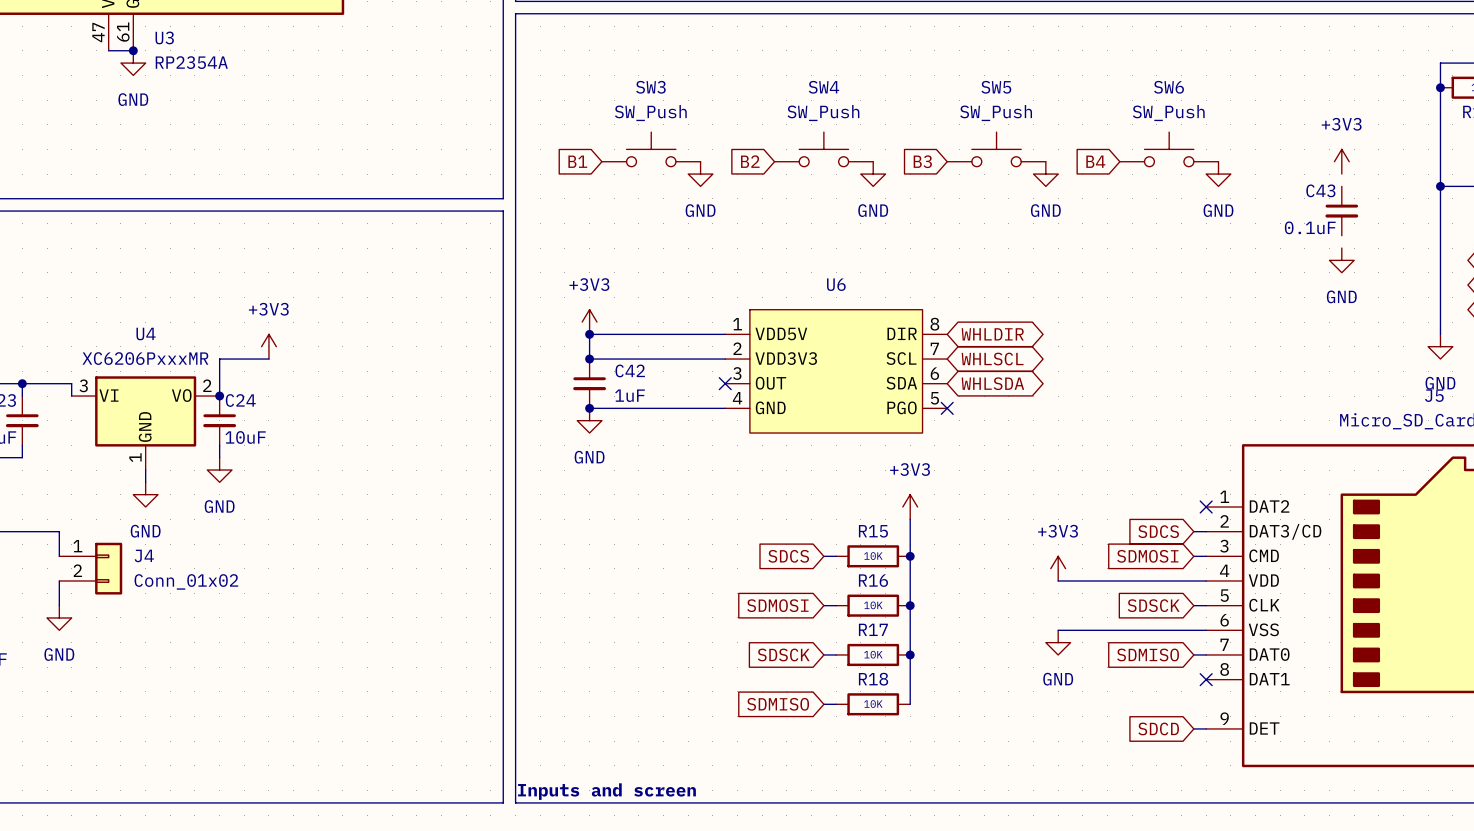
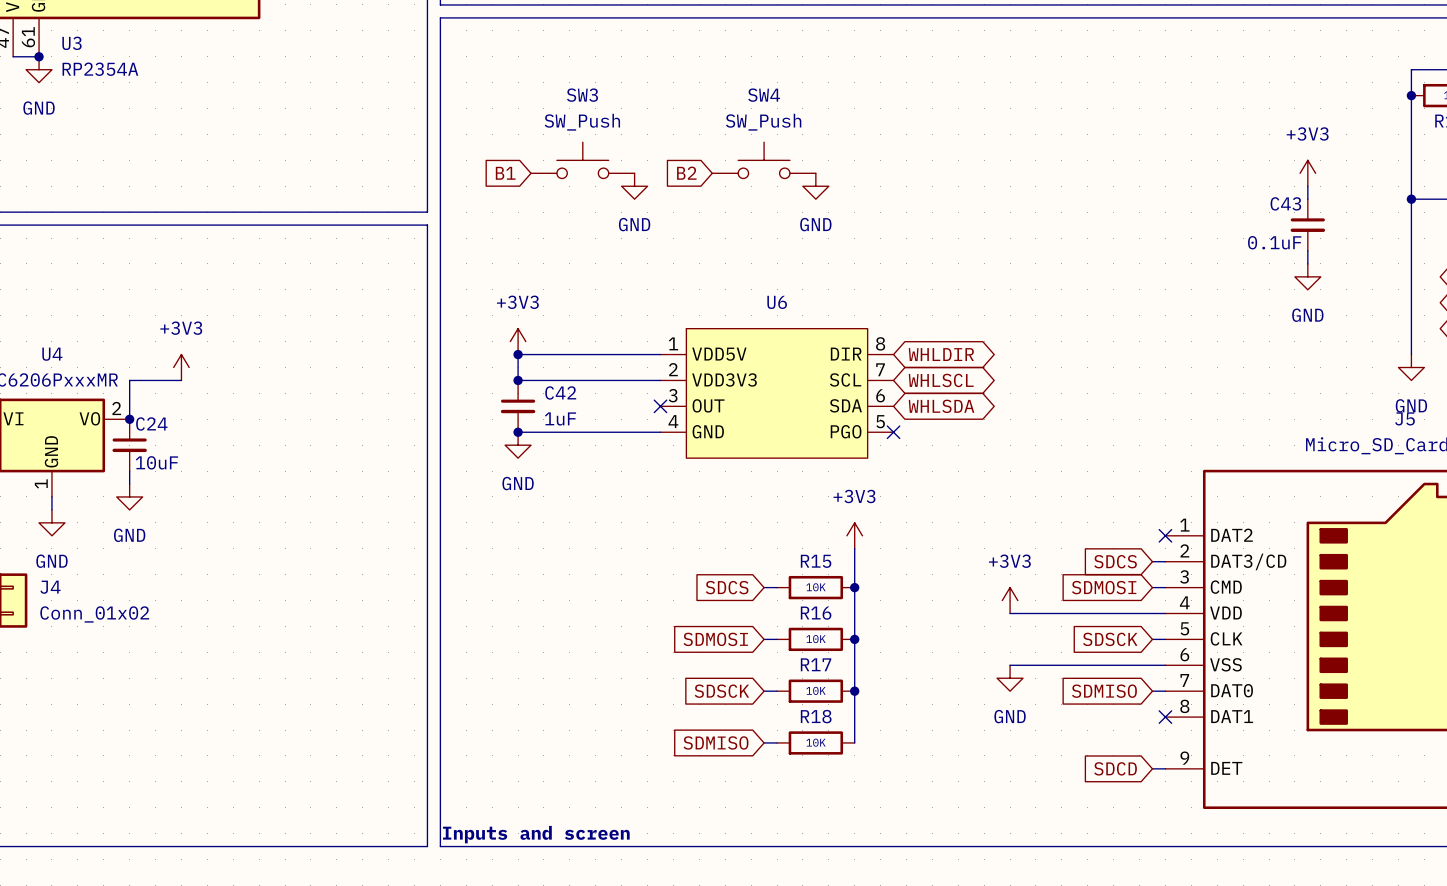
SW5: SW_Push (996, 149) -> none
SW6: SW_Push (1169, 149) -> none
global label: B3 (922, 161) -> none
global label: B4 (1095, 161) -> none
power symbol: GND (1045, 174) -> none
power symbol: GND (1218, 174) -> none
wire: none -> (1307, 186) (1307, 199)
wire: none -> (1307, 250) (1307, 263)

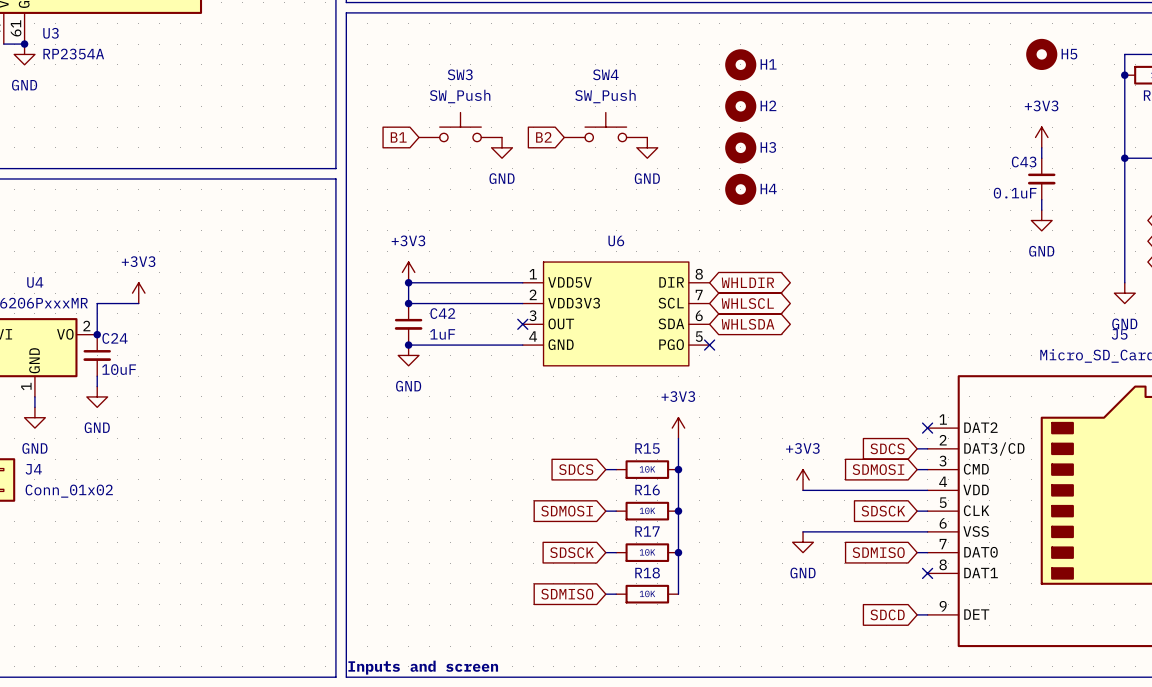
H5: none -> (1041, 54)
H1: none -> (740, 64)
H2: none -> (740, 106)
H3: none -> (740, 147)
H4: none -> (740, 189)

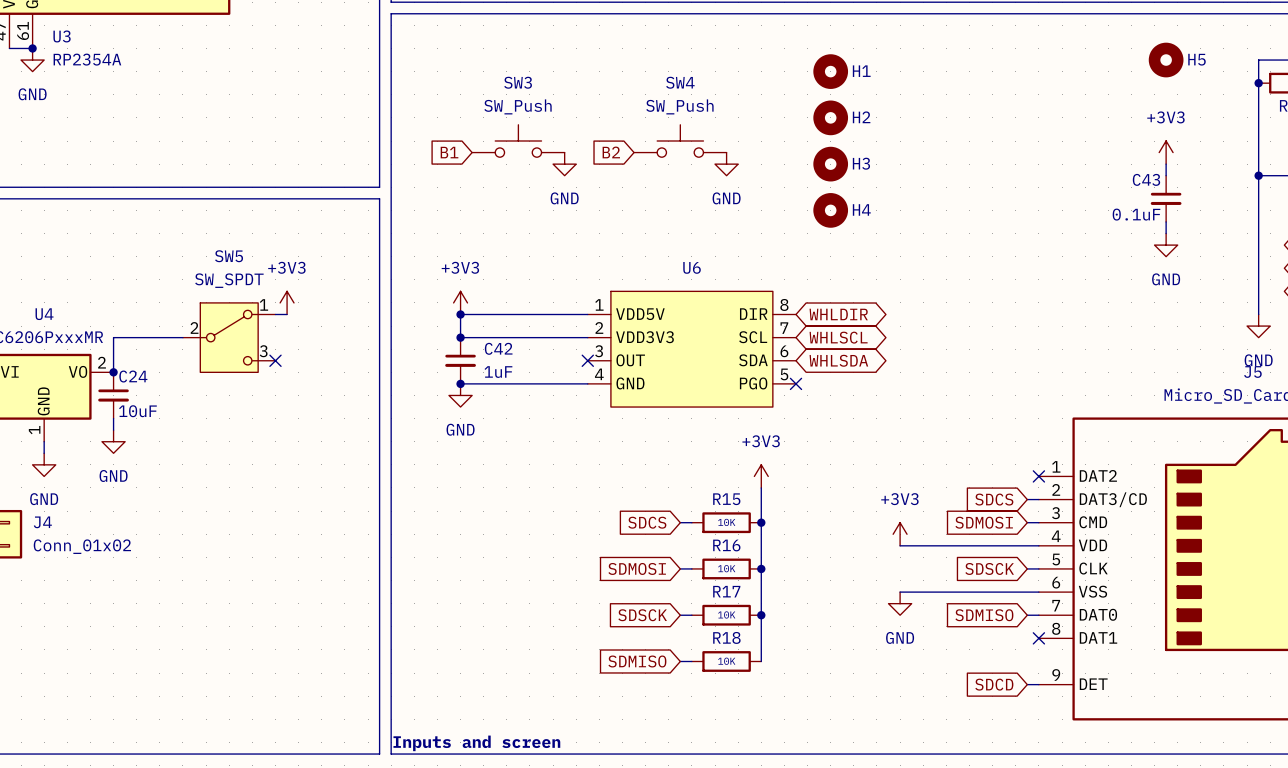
wire: none -> (275, 314) (287, 314)
power symbol position: +3V3 (138, 293) -> +3V3 (287, 302)
wire: none -> (159, 337) (182, 337)
SW5: none -> SW_SPDT (229, 337)
no-connect mark: none -> (275, 360)

